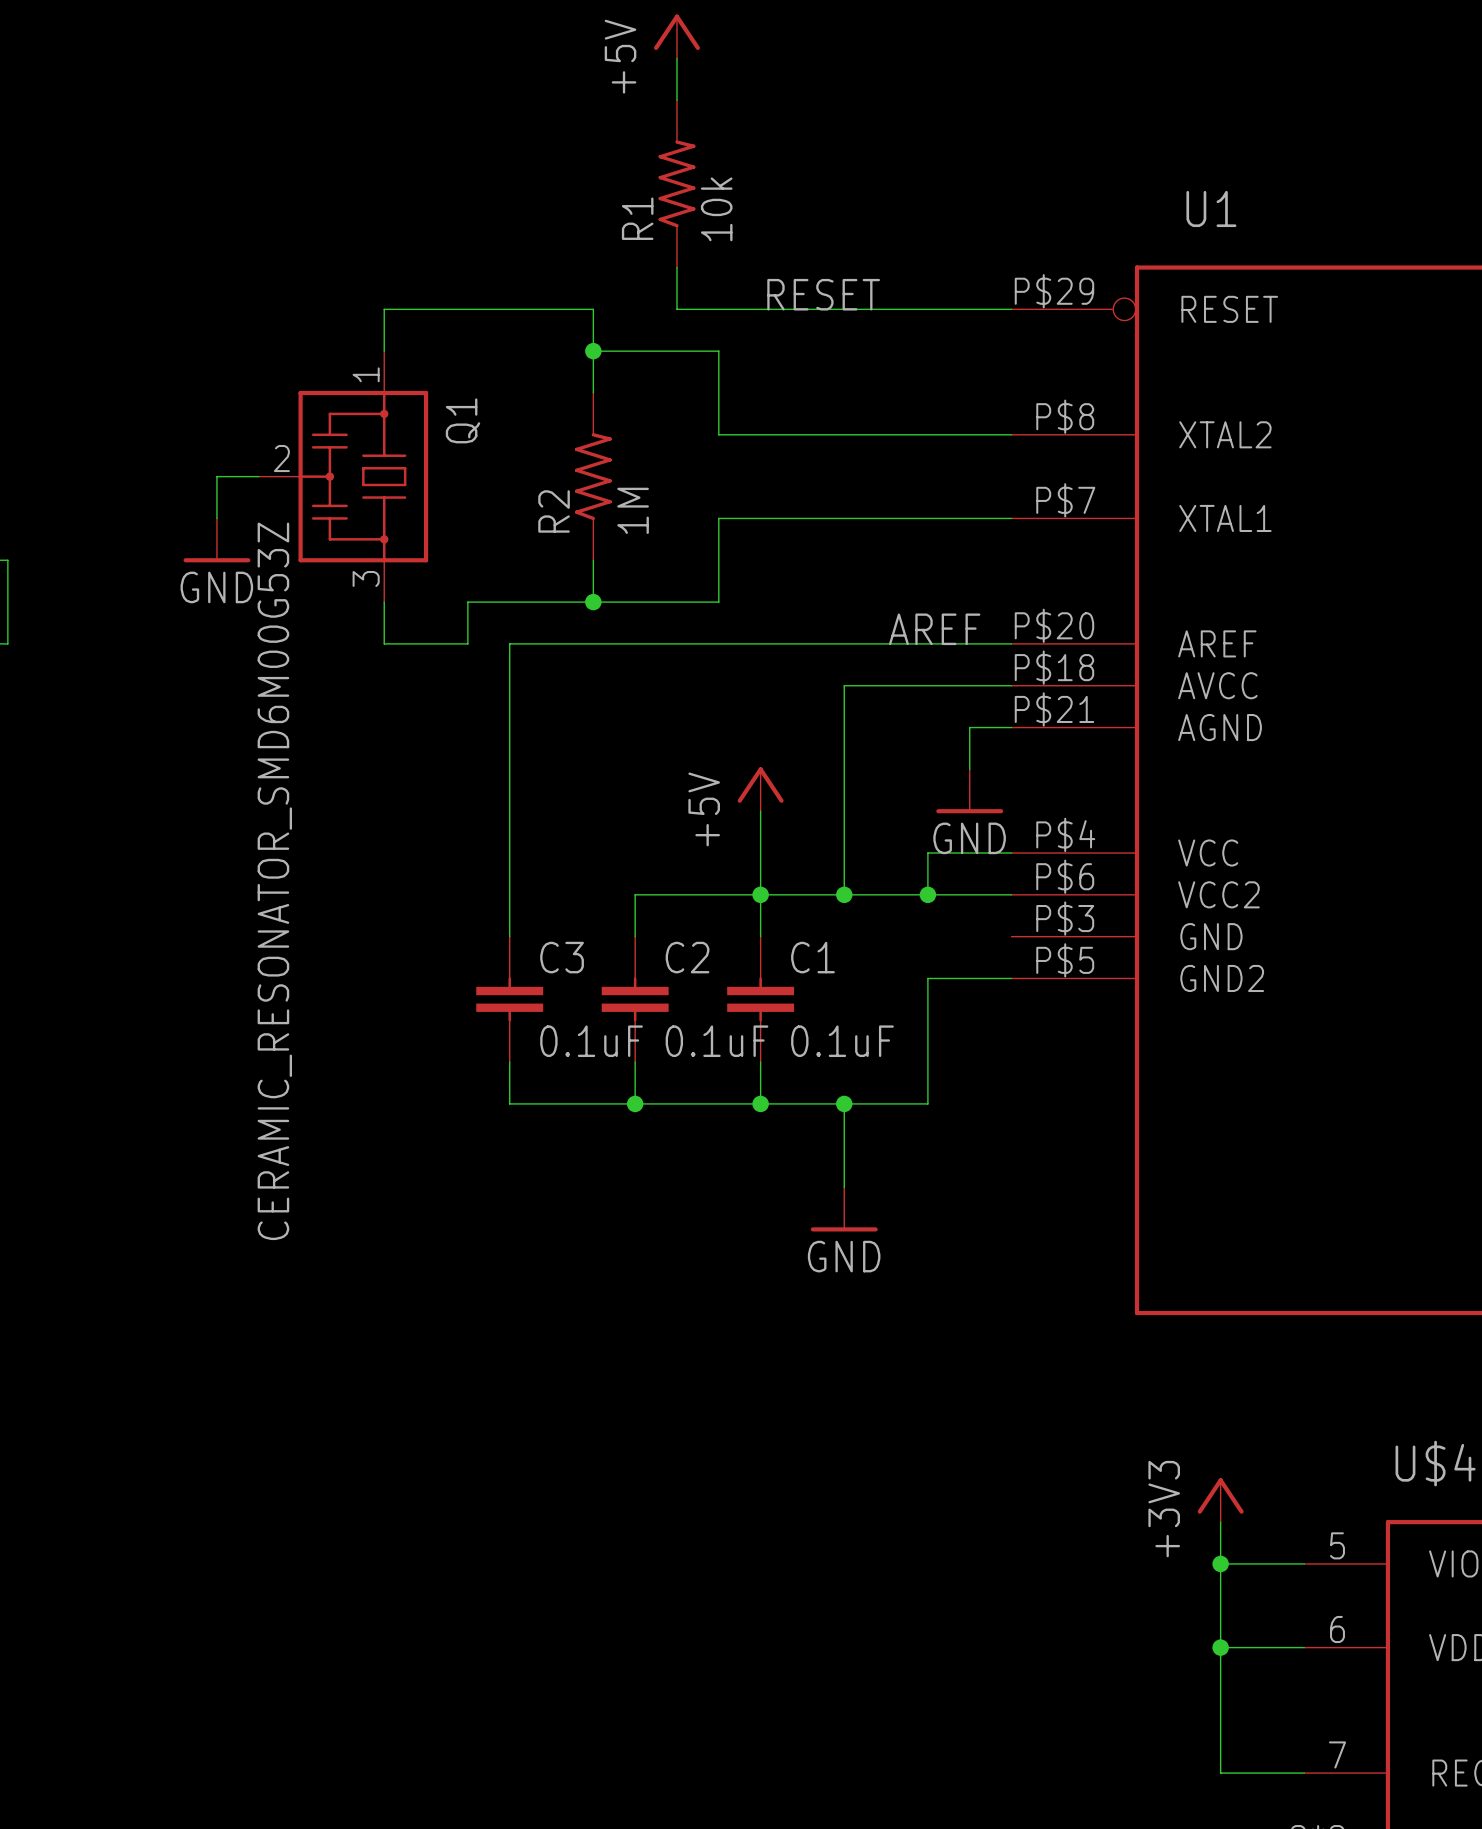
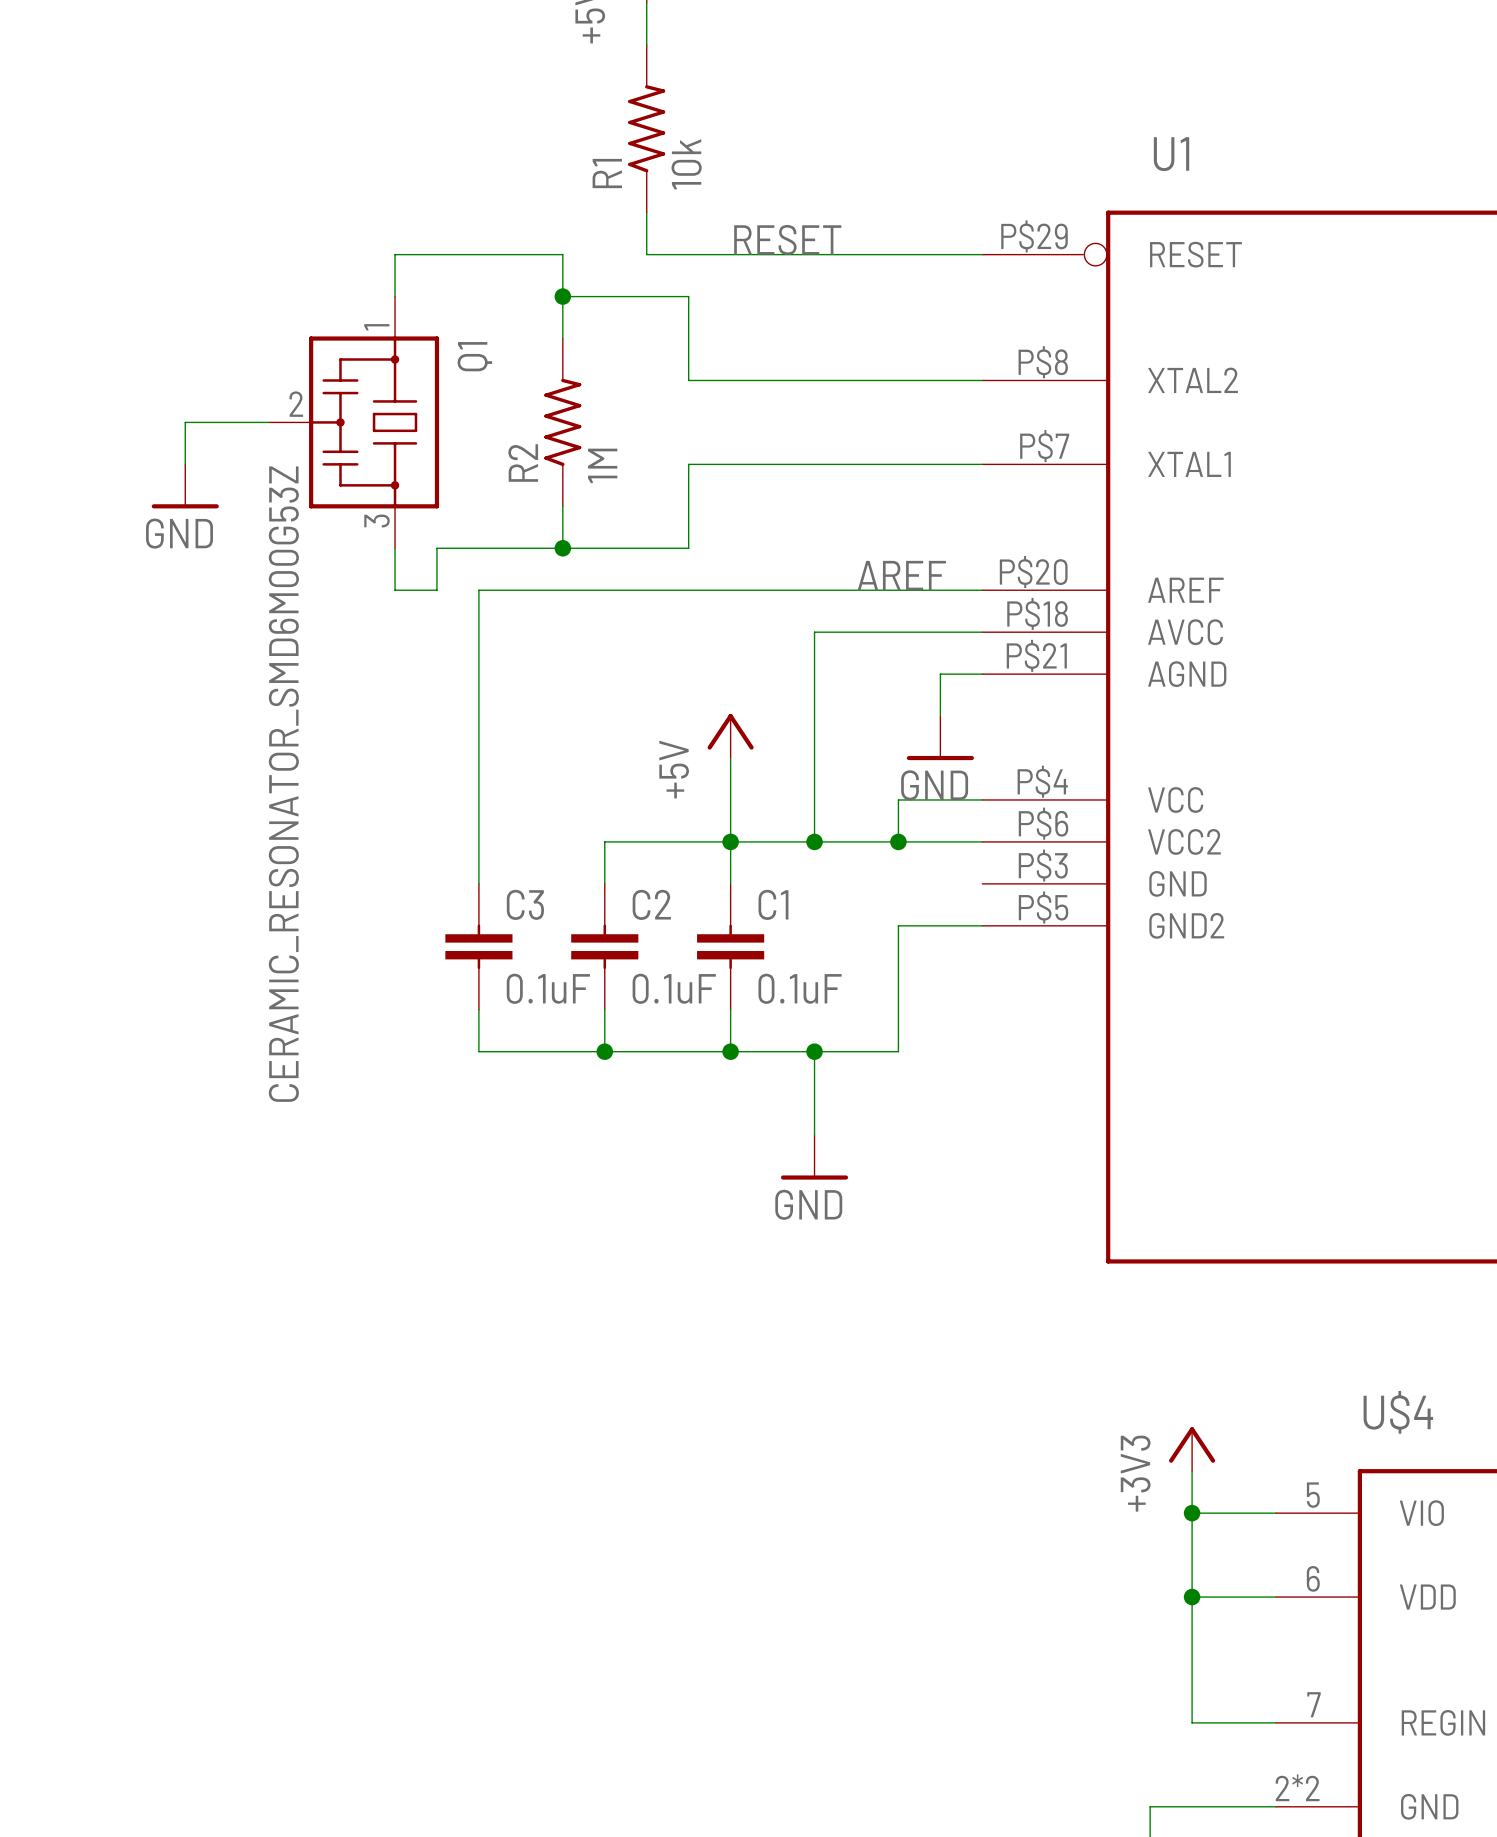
wire: (426, 309) (384, 309) (384, 351) -> (395, 254) (395, 296)
Q1 position: (343, 476) -> (354, 422)
wire: (384, 602) (384, 643) (426, 643) -> (395, 548) (395, 590)

